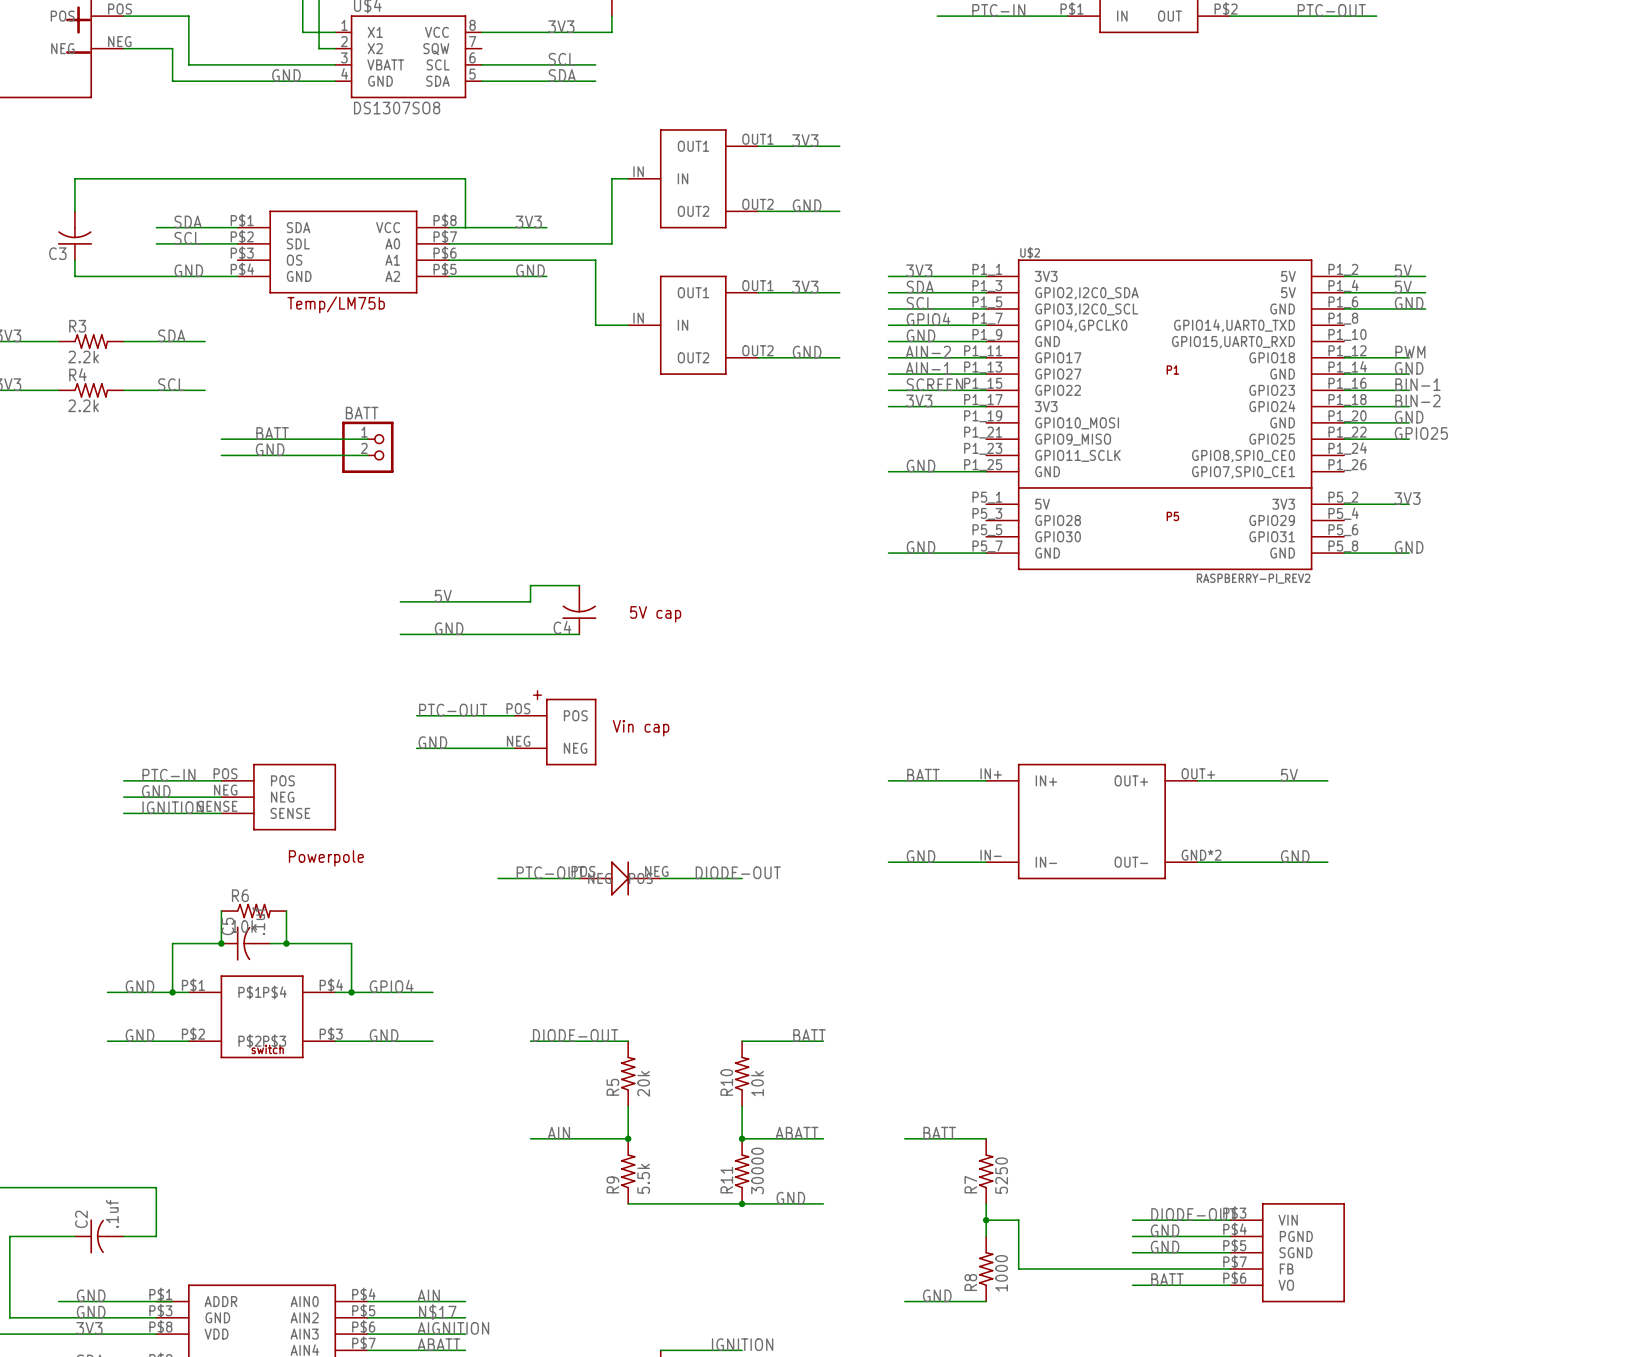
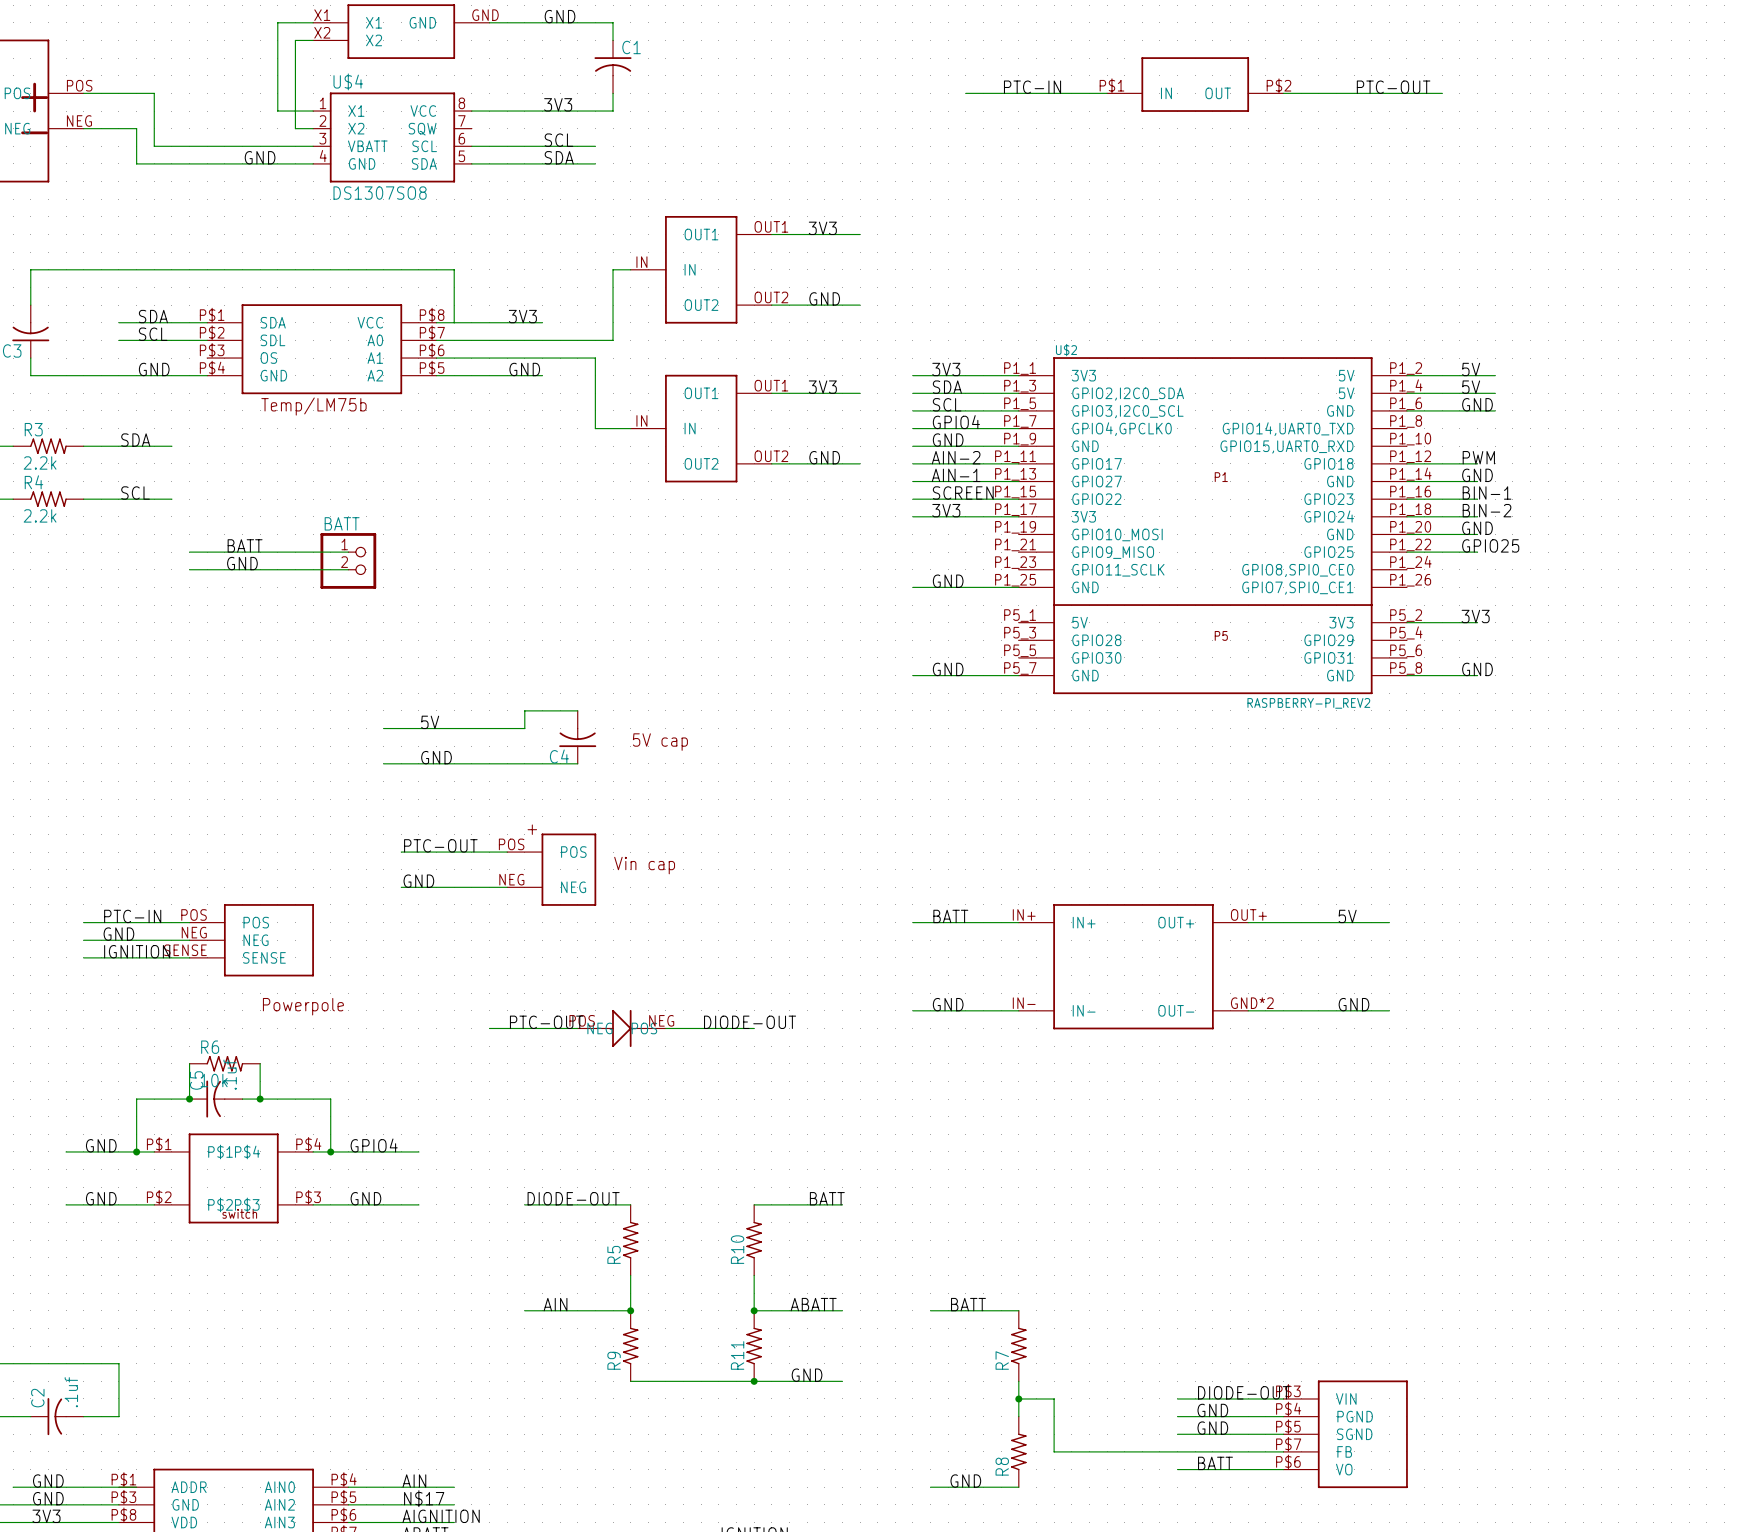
R5 value: 20k (643, 1083) -> none
R10 value: 10k (757, 1083) -> none
R11 value: 30000 (757, 1171) -> none
R7 value: 5250 (1001, 1175) -> none
R9 value: 5.5k (643, 1178) -> none
R8 value: 1000 (1001, 1273) -> none

